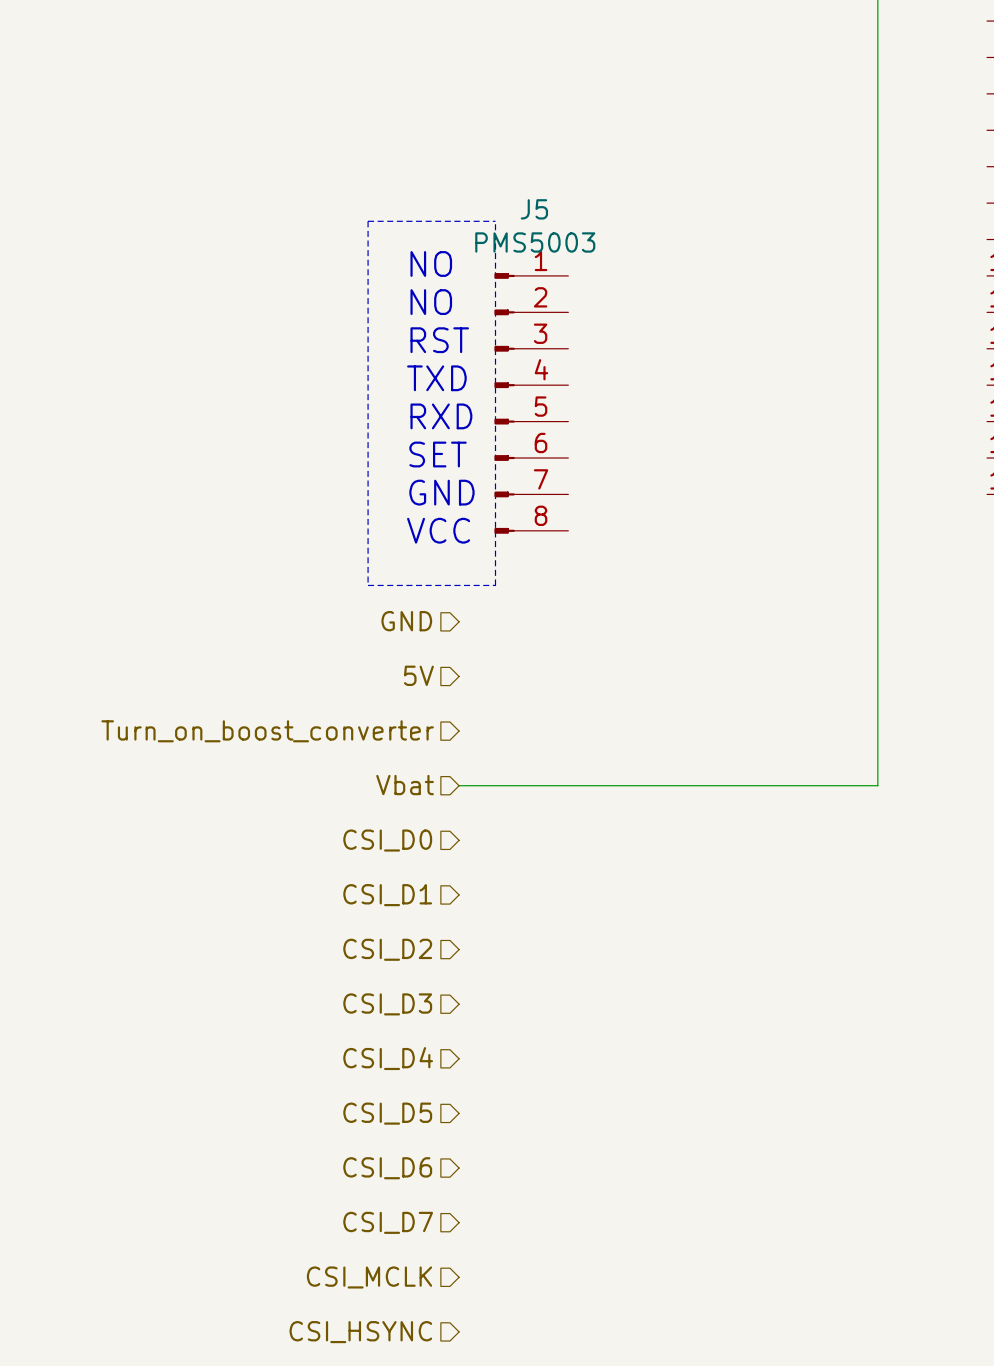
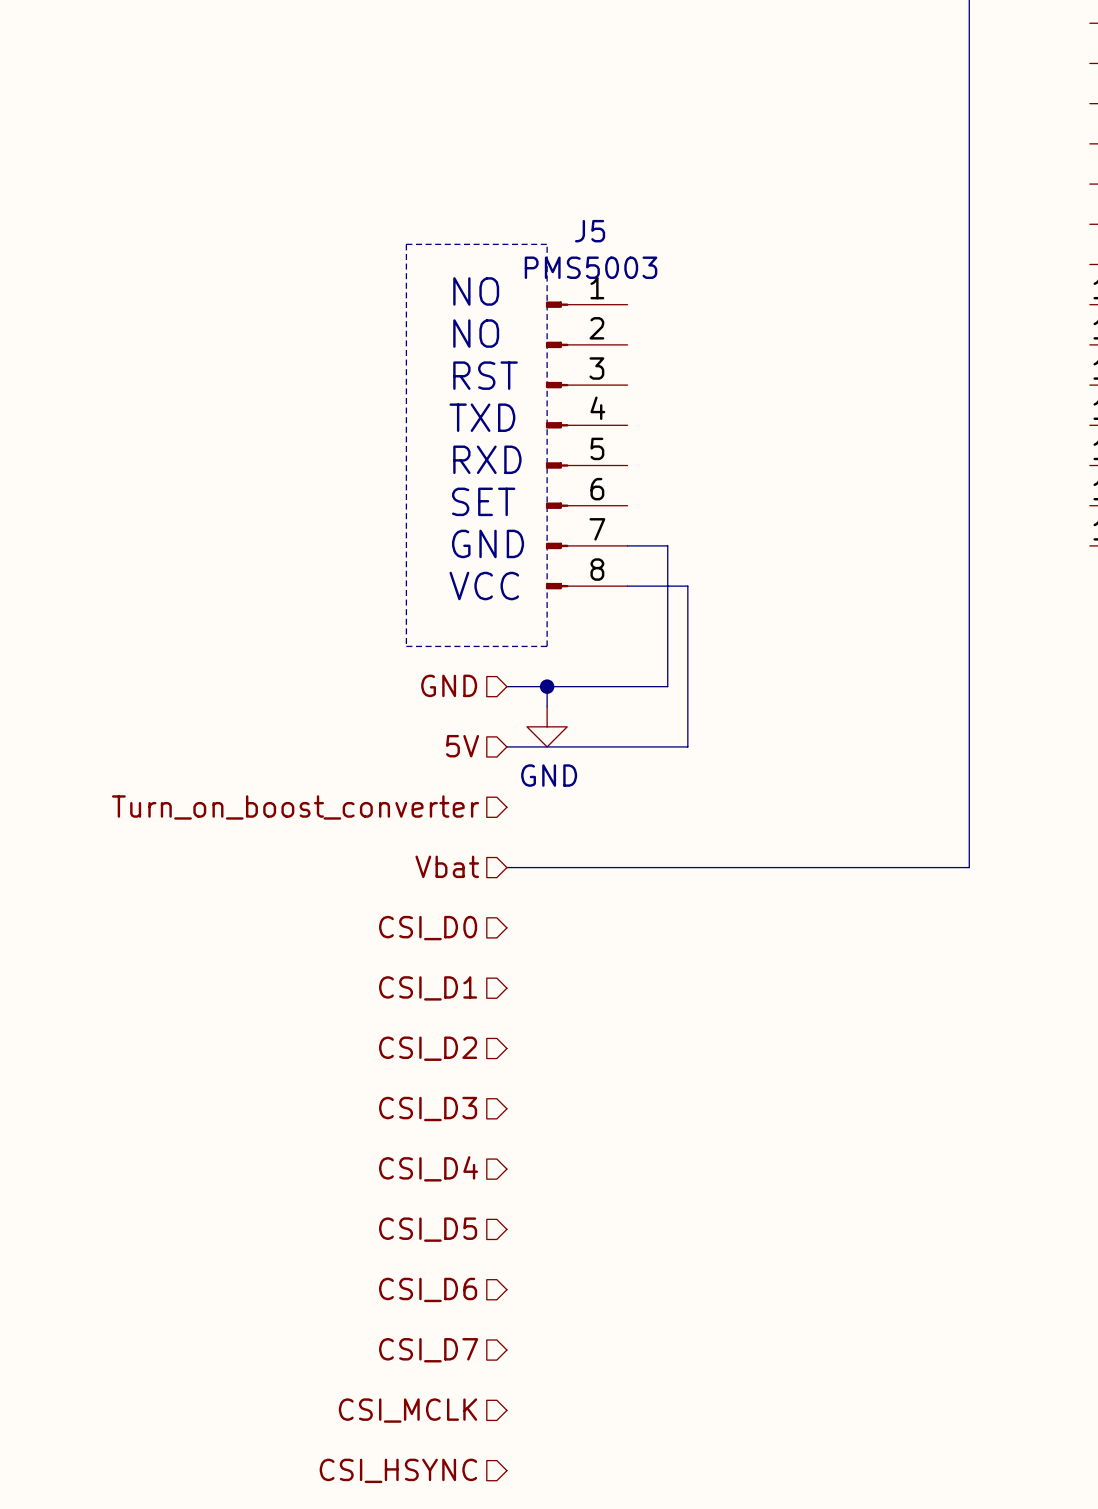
wire: none -> (627, 545) (667, 545) (667, 686) (506, 686)
wire: none -> (627, 586) (687, 586) (687, 746) (506, 746)
wire: none -> (547, 686) (547, 706)
junction: none -> (547, 686)
power symbol: none -> GND (547, 726)

